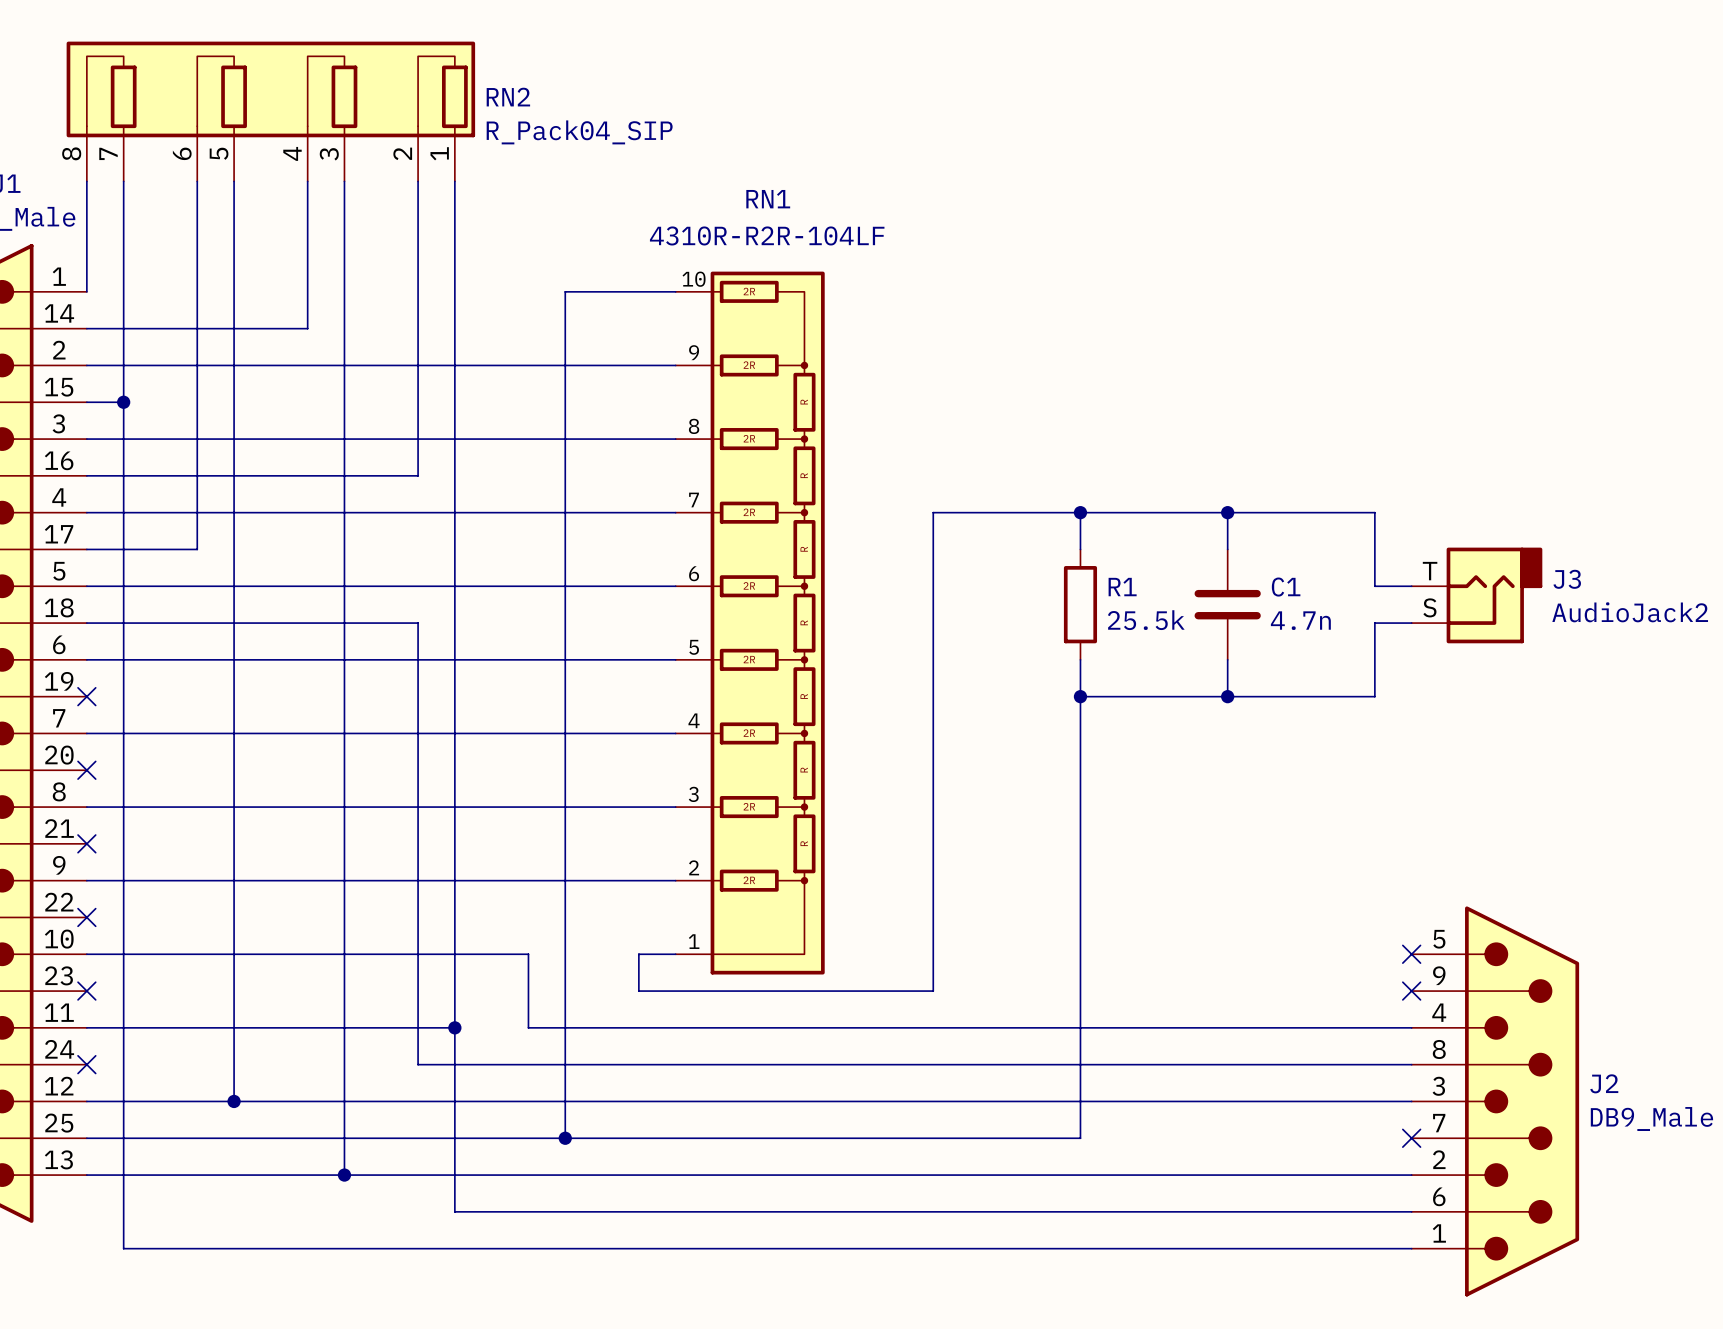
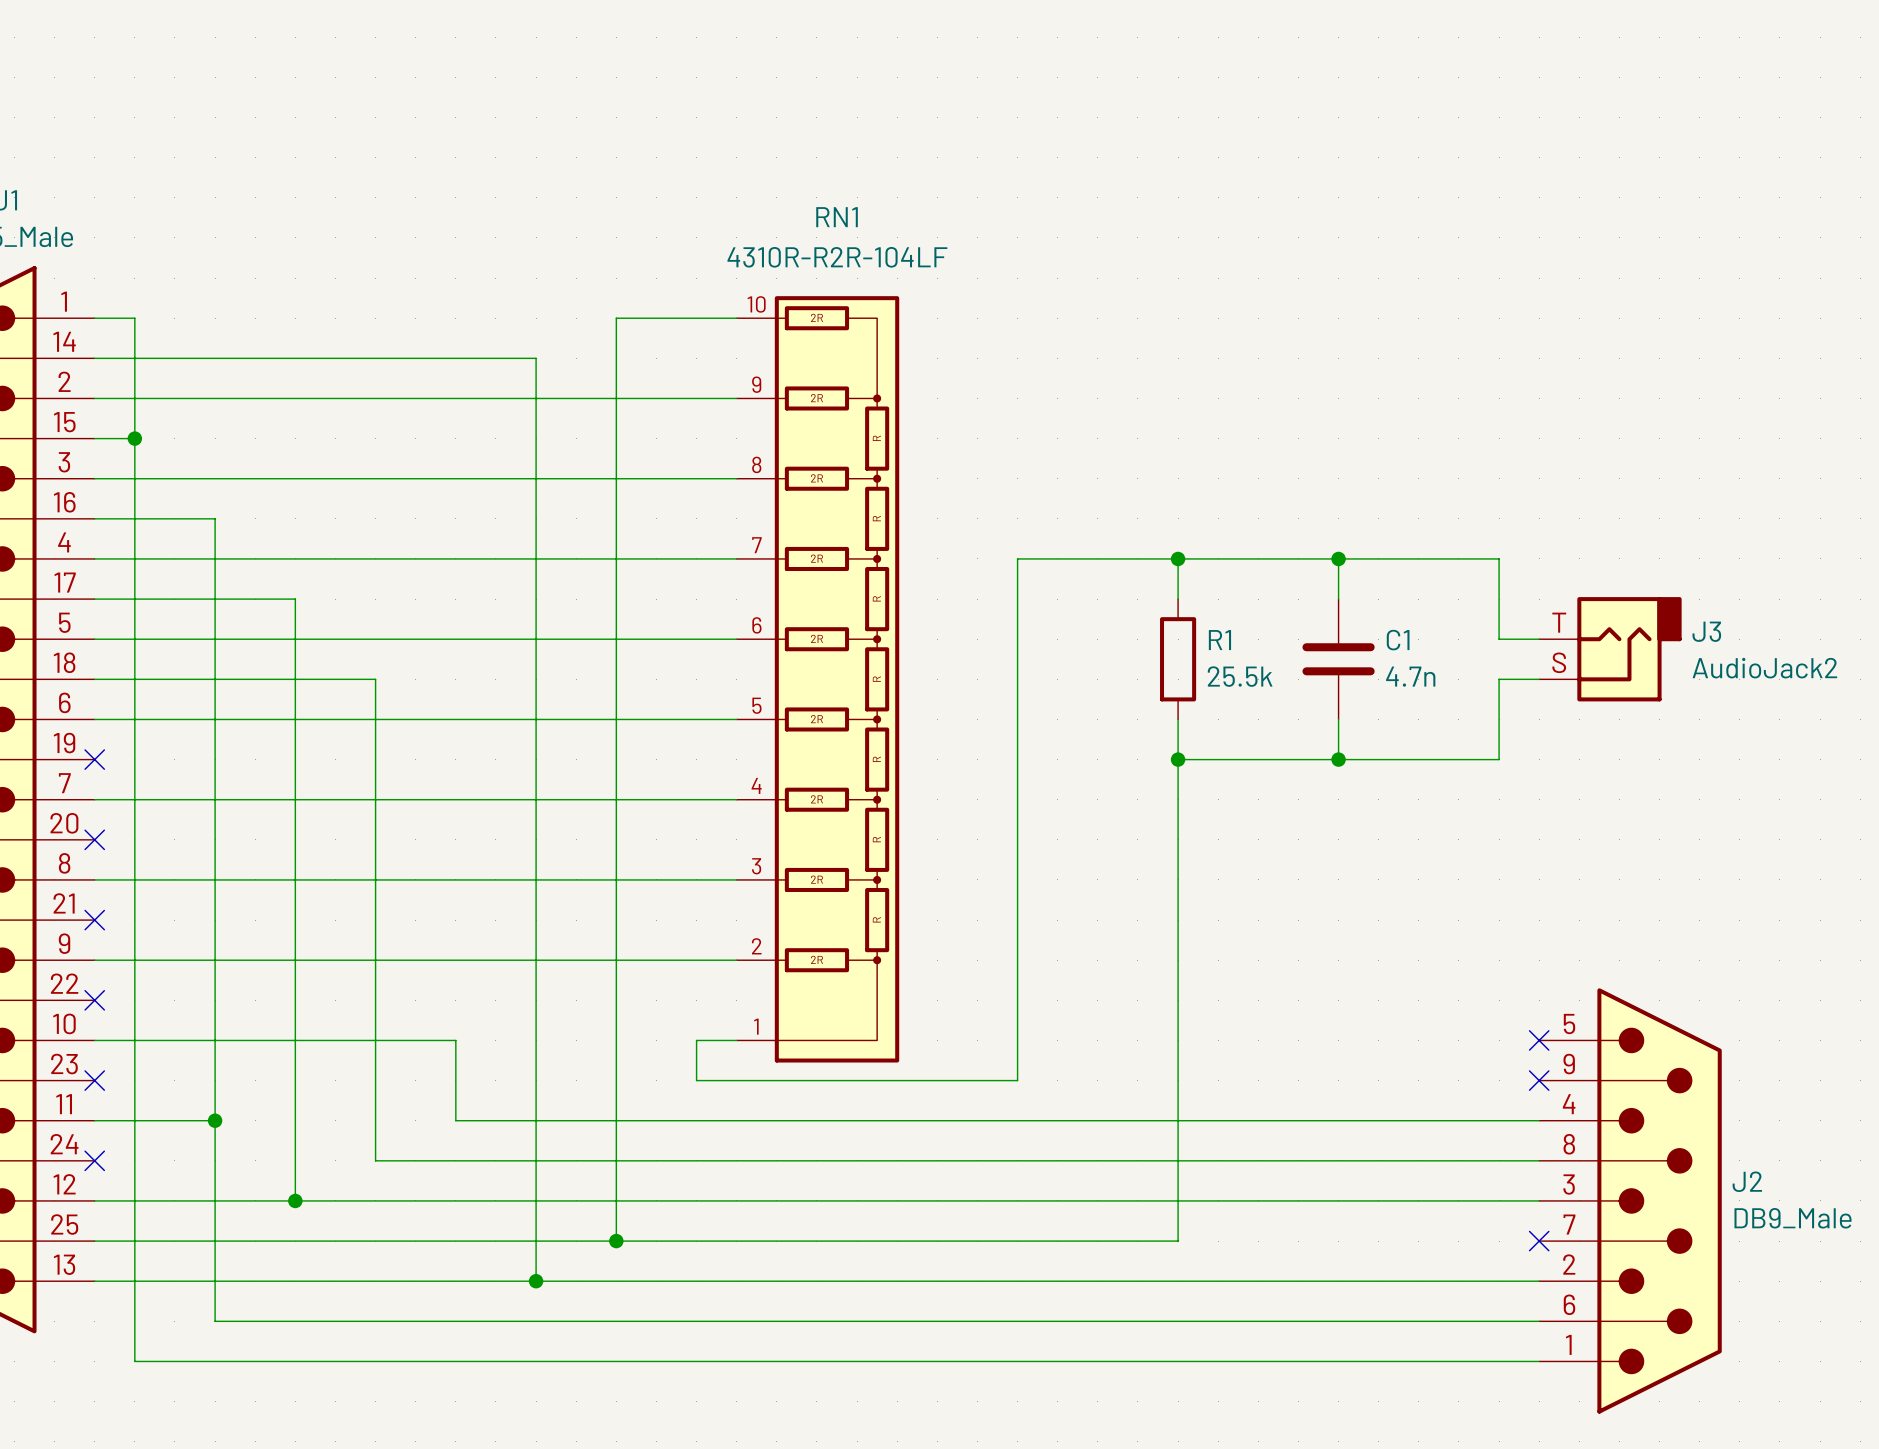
RN2: R_Pack04_SIP (270, 111) -> none
wire: (86, 181) (86, 291) -> (134, 318) (94, 318)
wire: (123, 181) (123, 291) -> none
wire: (197, 181) (197, 475) (418, 475) (418, 181) -> none
wire: (234, 181) (234, 1101) -> none
wire: (307, 181) (307, 328) -> (536, 1281) (536, 358) (335, 358)
wire: (344, 181) (344, 623) (418, 623) (418, 954) (528, 954) (528, 1027) -> (495, 1120) (576, 1120)
wire: (454, 181) (454, 1211) -> (295, 1200) (295, 599) (215, 599) (215, 1321) (495, 1321)
wire: (197, 1027) (418, 1027) (418, 1064) -> none
junction: none -> (215, 1120)
junction: (454, 1027) -> none
wire: (344, 1064) (344, 1175) -> (375, 1160) (455, 1160)
junction position: (234, 1101) -> (295, 1200)
junction: (344, 1175) -> none
junction: none -> (536, 1281)

